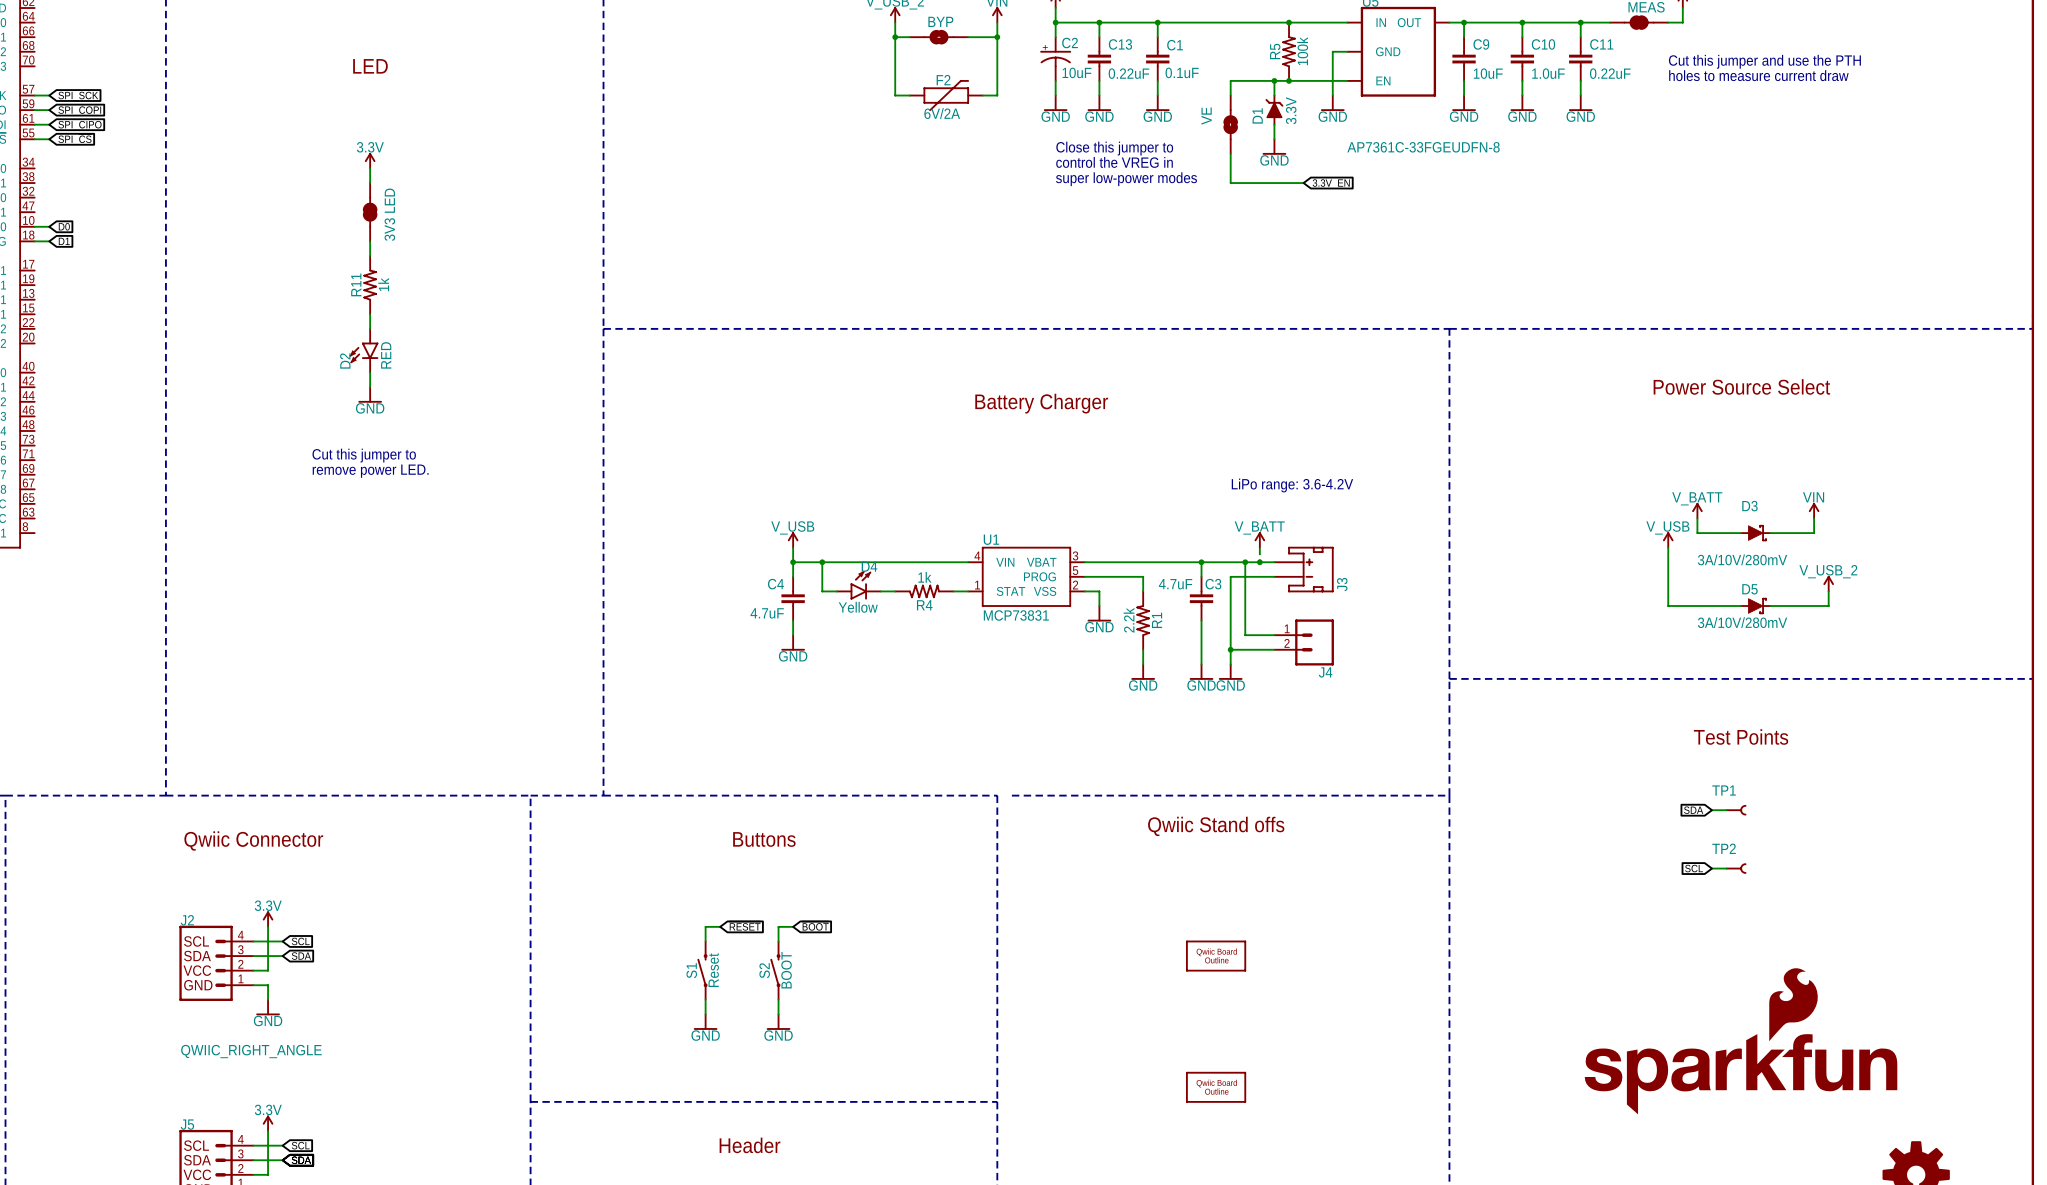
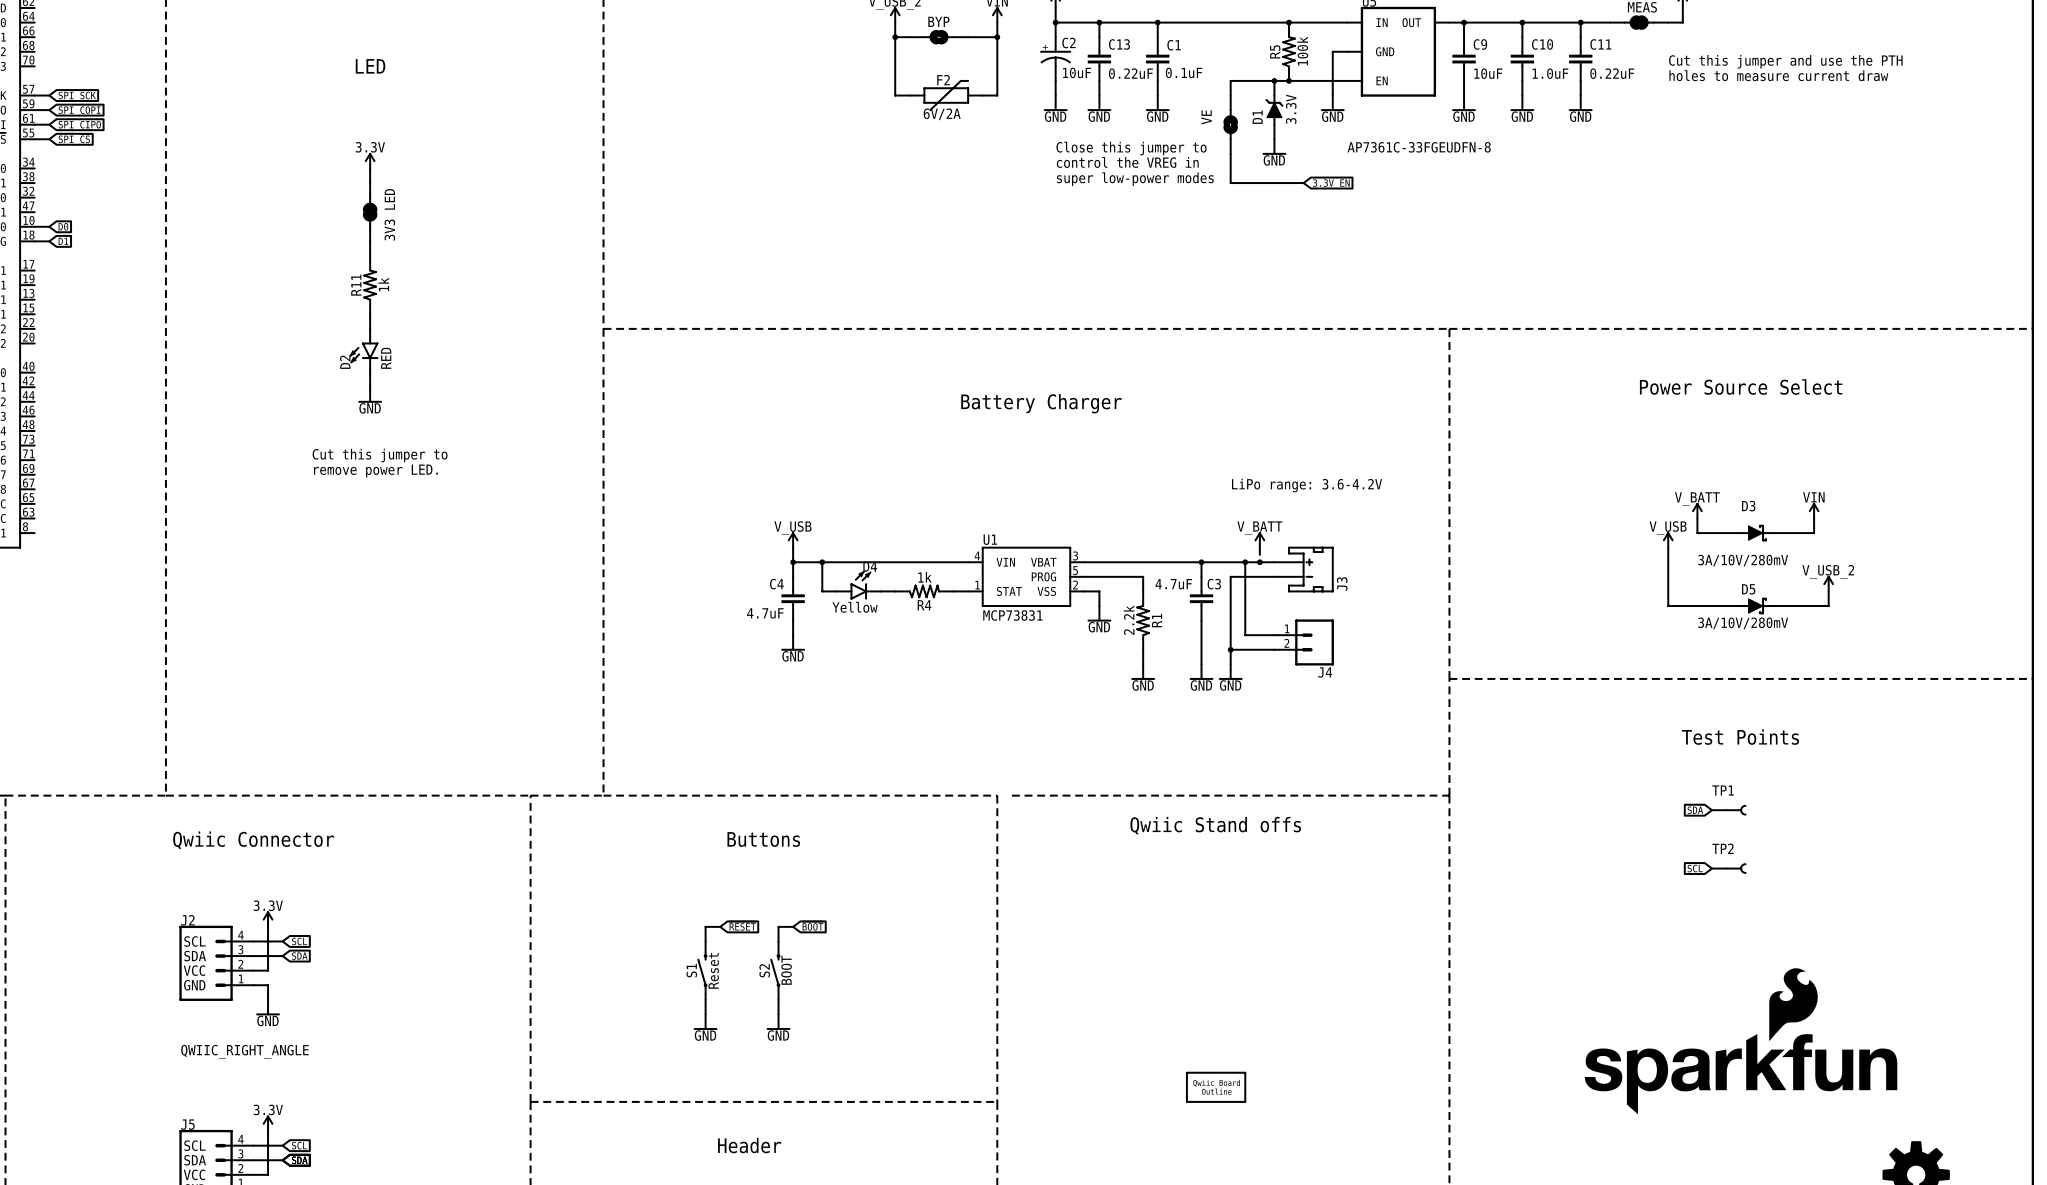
part: (1216, 956) -> none

